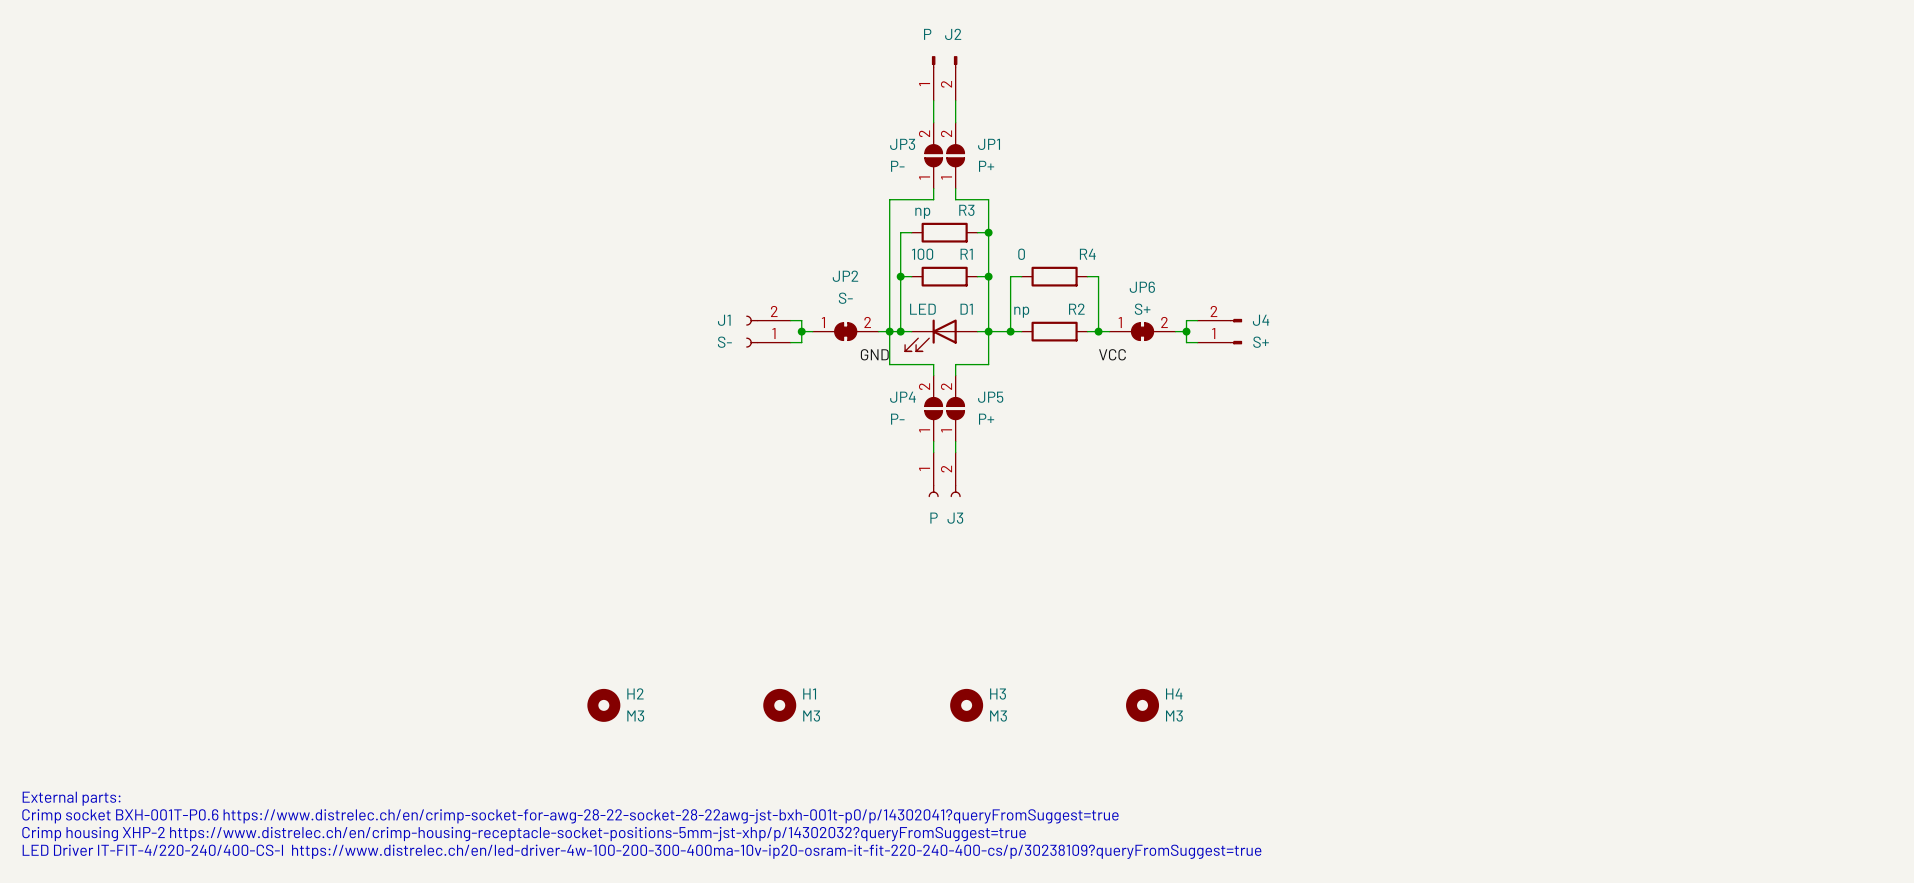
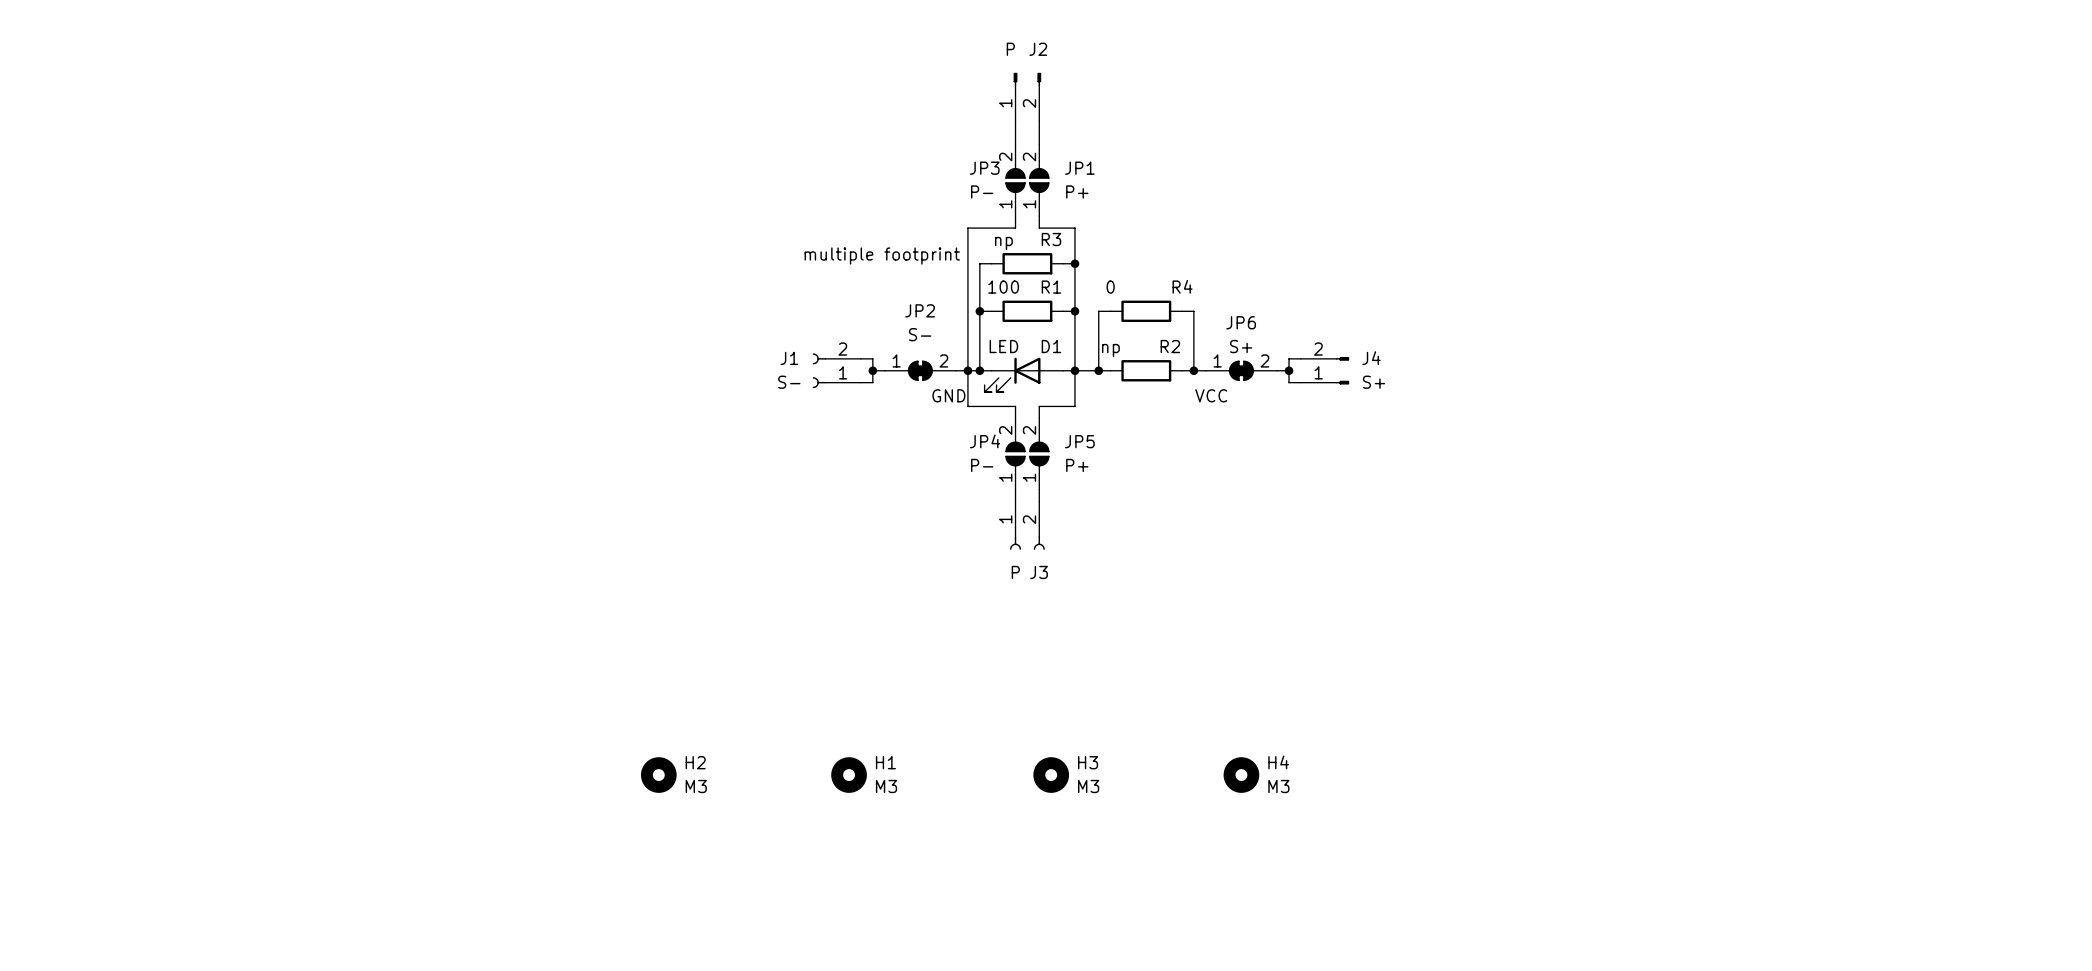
text: none -> multiple footprint (882, 255)
text: External parts: (71, 798) -> none
text: Crimp socket BXH-001T-P0.6 https://www.distrelec.ch/en/crimp-socket-for-awg-28-22-socket-28-22awg-jst-bxh-001t-p0/p/14302041?queryFromSuggest=true (570, 816) -> none
text: Crimp housing XHP-2 https://www.distrelec.ch/en/crimp-housing-receptacle-socket-positions-5mm-jst-xhp/p/14302032?queryFromSuggest=true (524, 834) -> none
text: LED Driver IT-FIT-4/220-240/400-CS-I https://www.distrelec.ch/en/led-driver-4w-100-200-300-400ma-10v-ip20-osram-it-fit-220-240-400-cs/p/30238109?queryFromSuggest=true (642, 851) -> none

